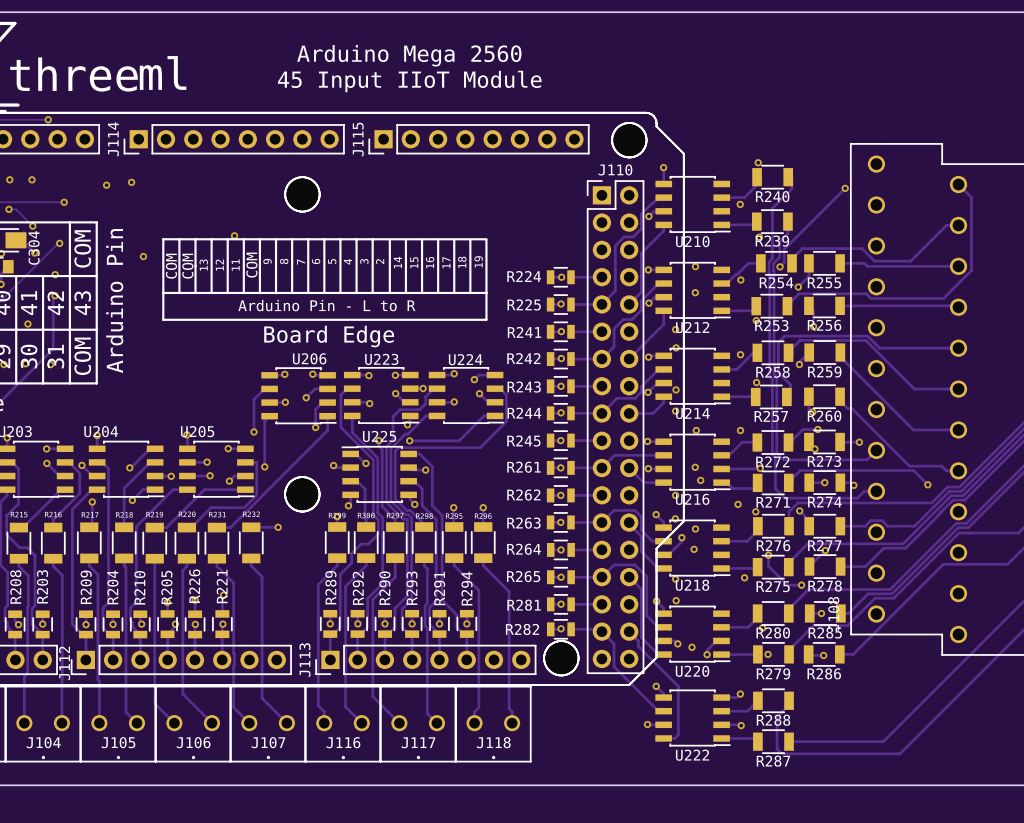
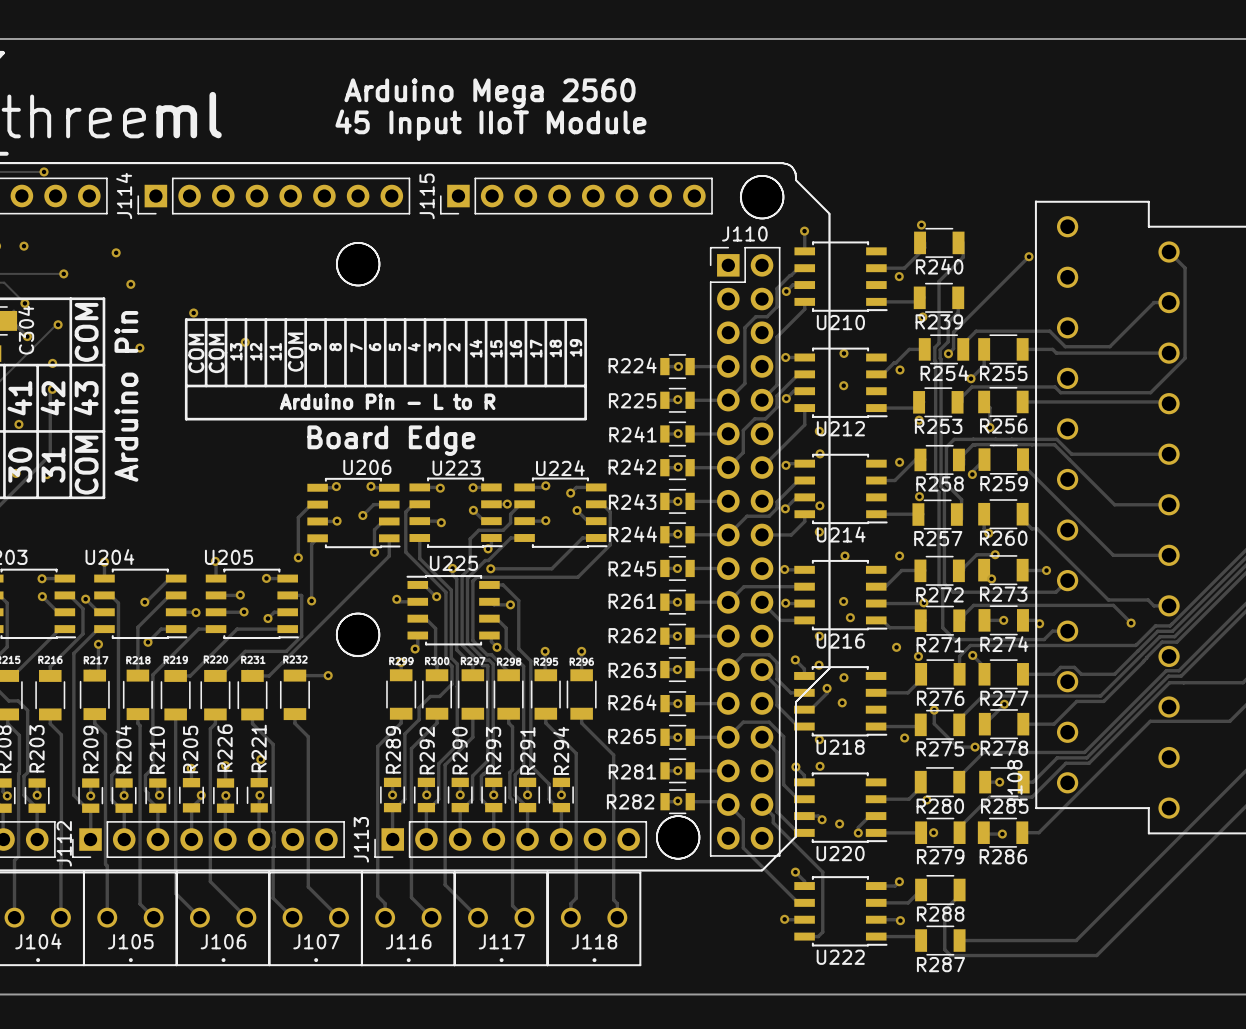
via: (131, 182) -> none
via: none -> (130, 284)
via: none -> (193, 313)
via position: (234, 235) -> (245, 342)
via: (143, 256) -> none
via: none -> (139, 348)

